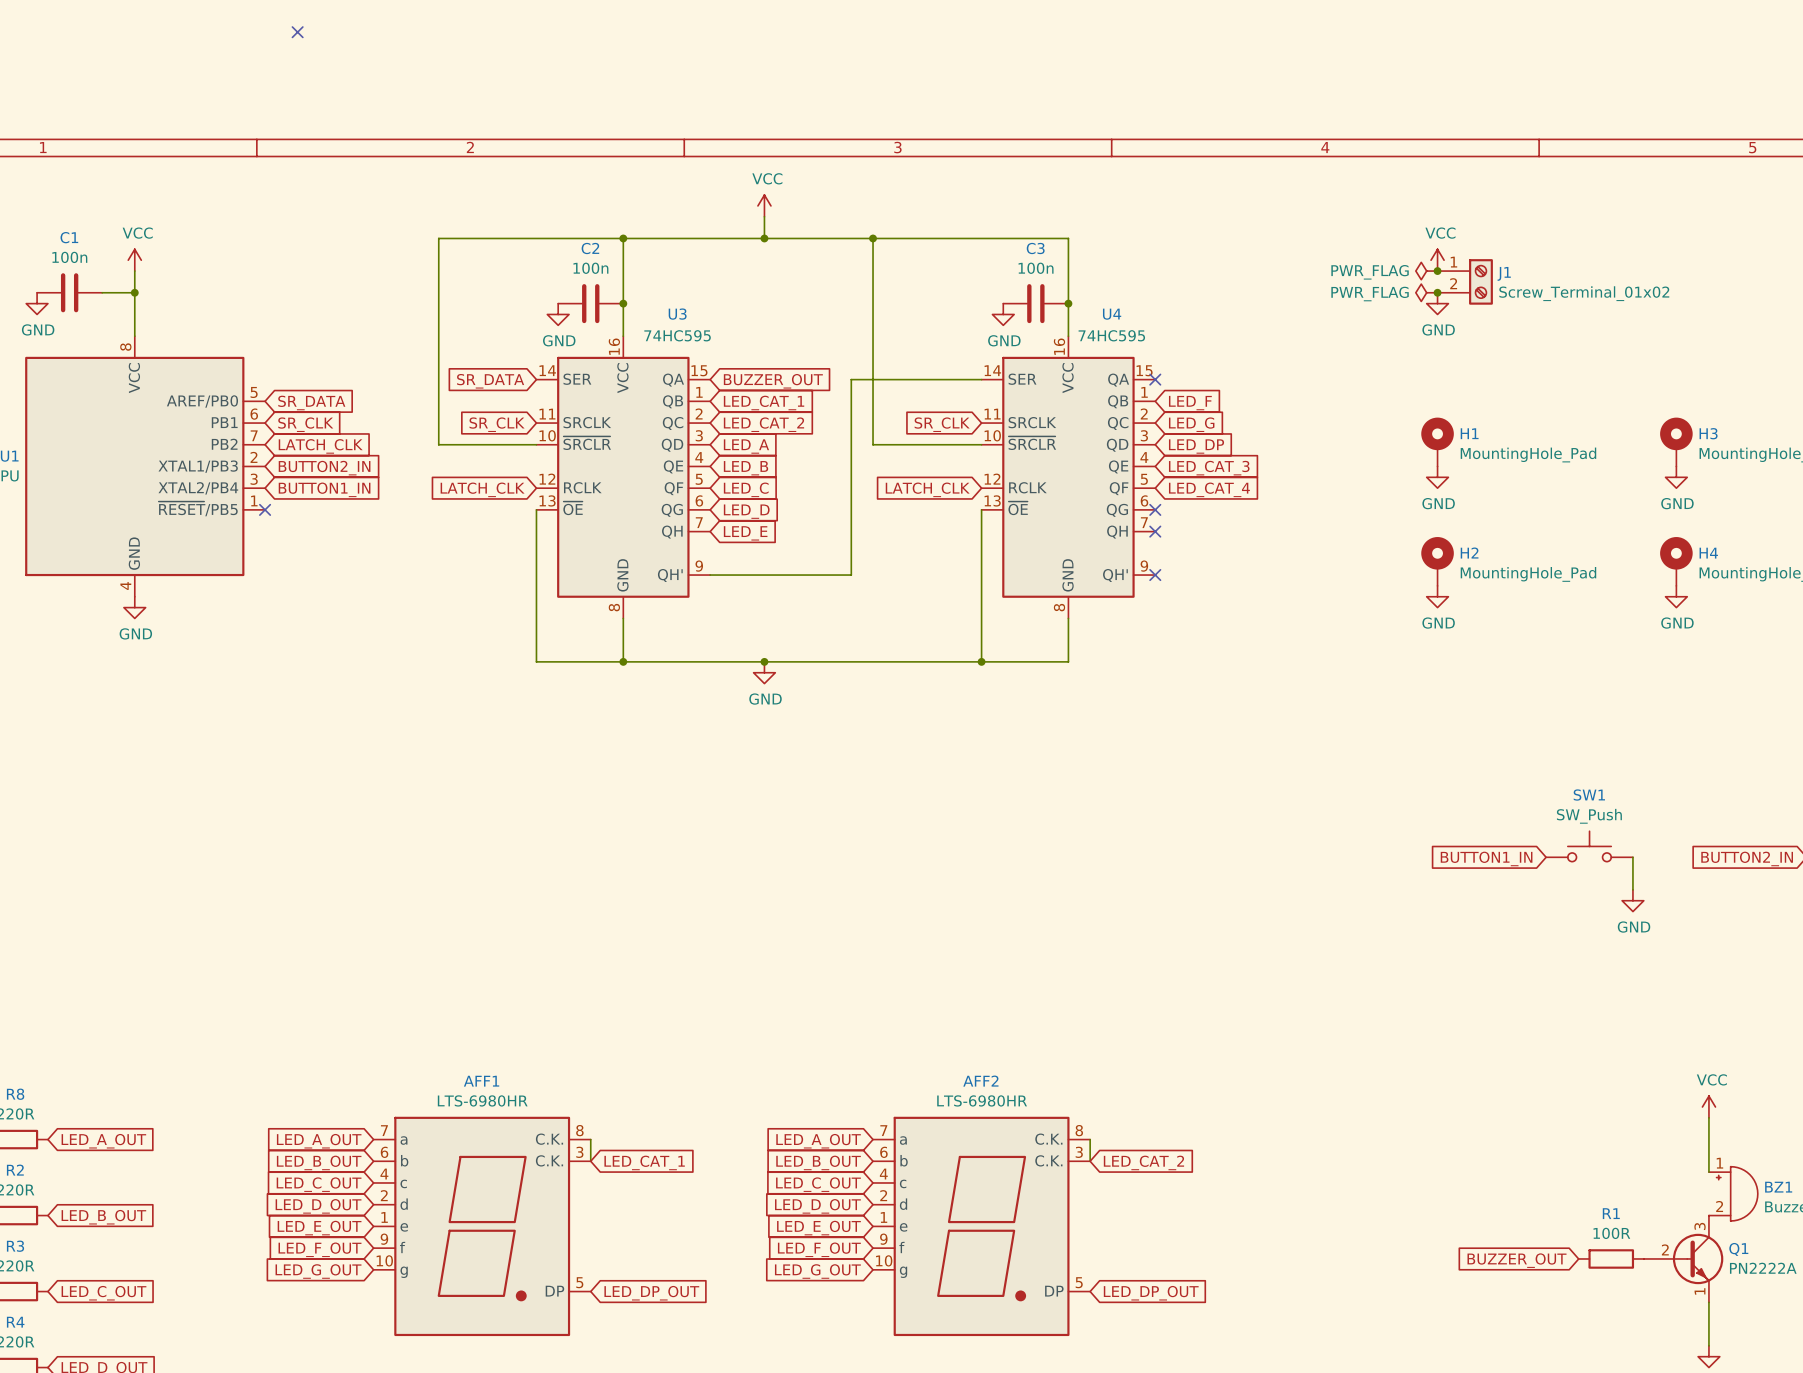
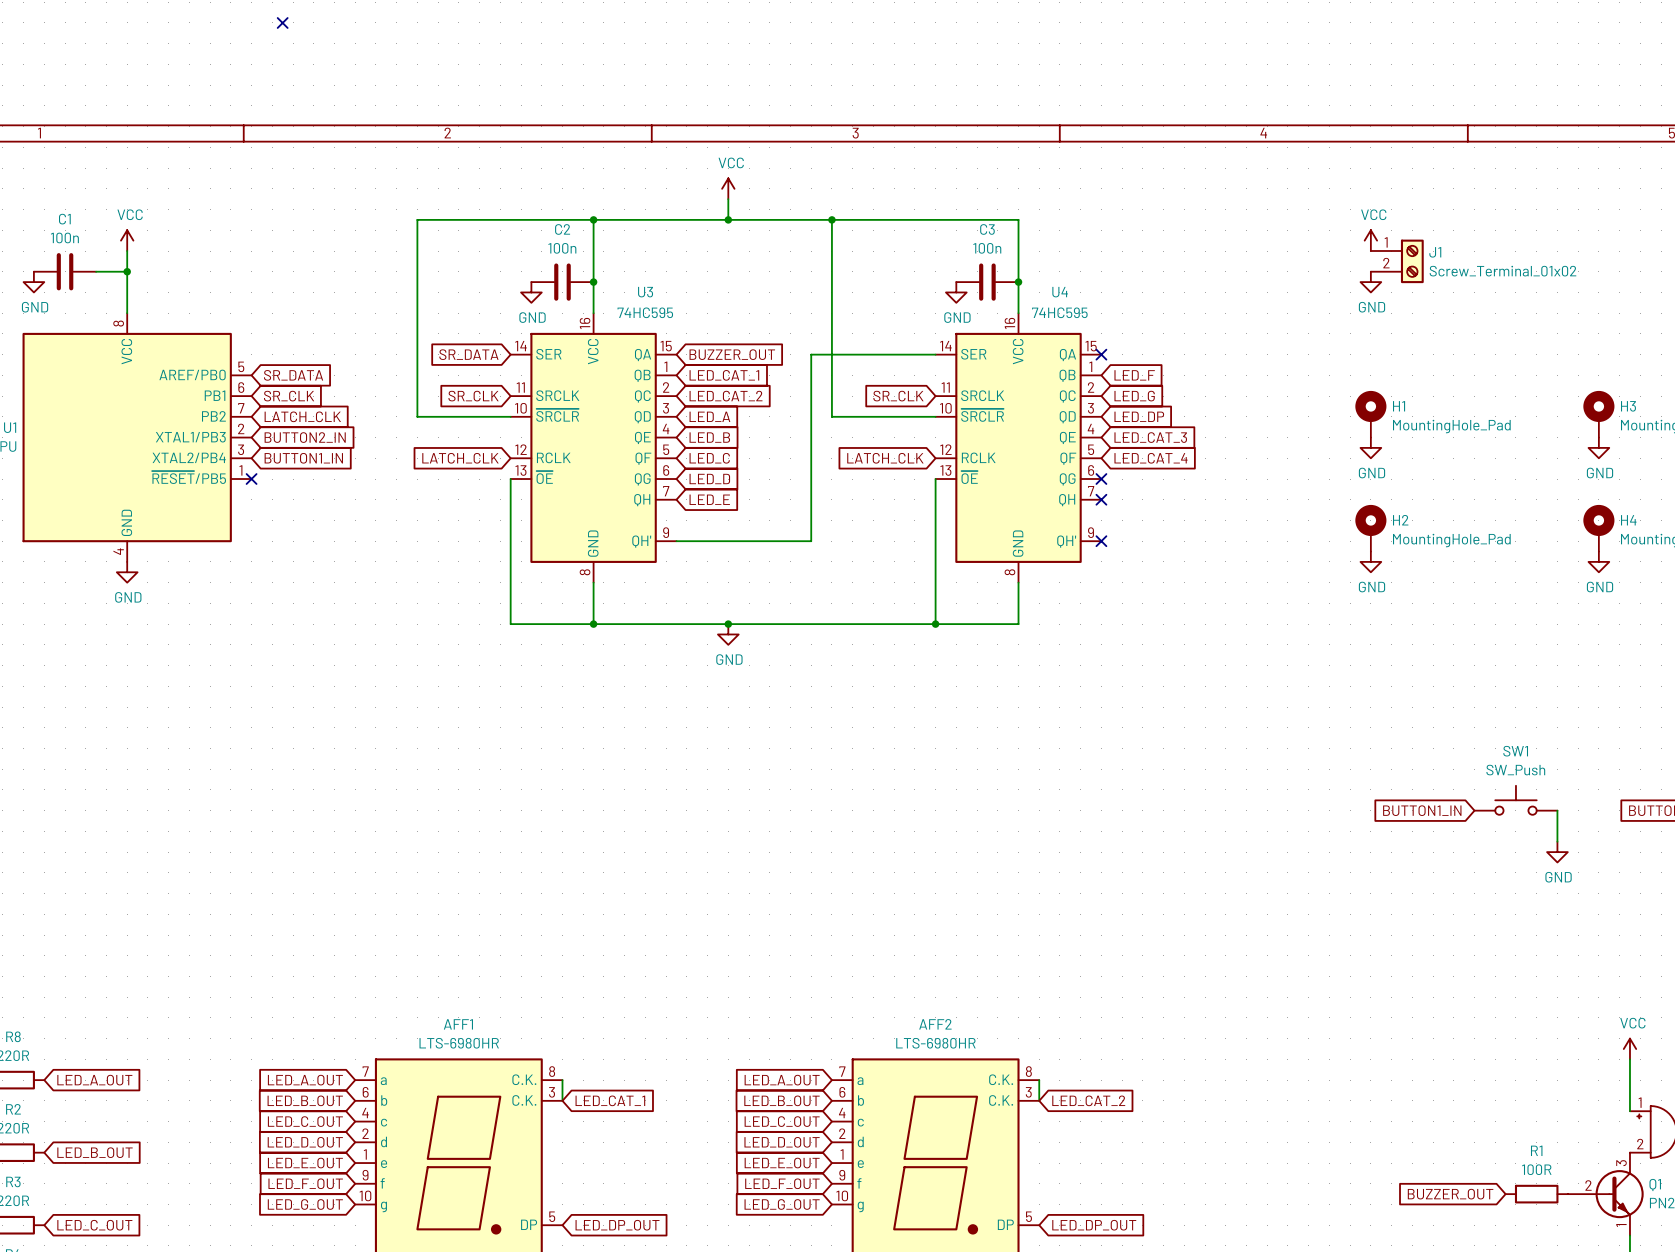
power symbol: PWR_FLAG (1426, 271) -> none
junction: (1437, 271) -> none
power symbol: PWR_FLAG (1426, 292) -> none
junction: (1437, 292) -> none

